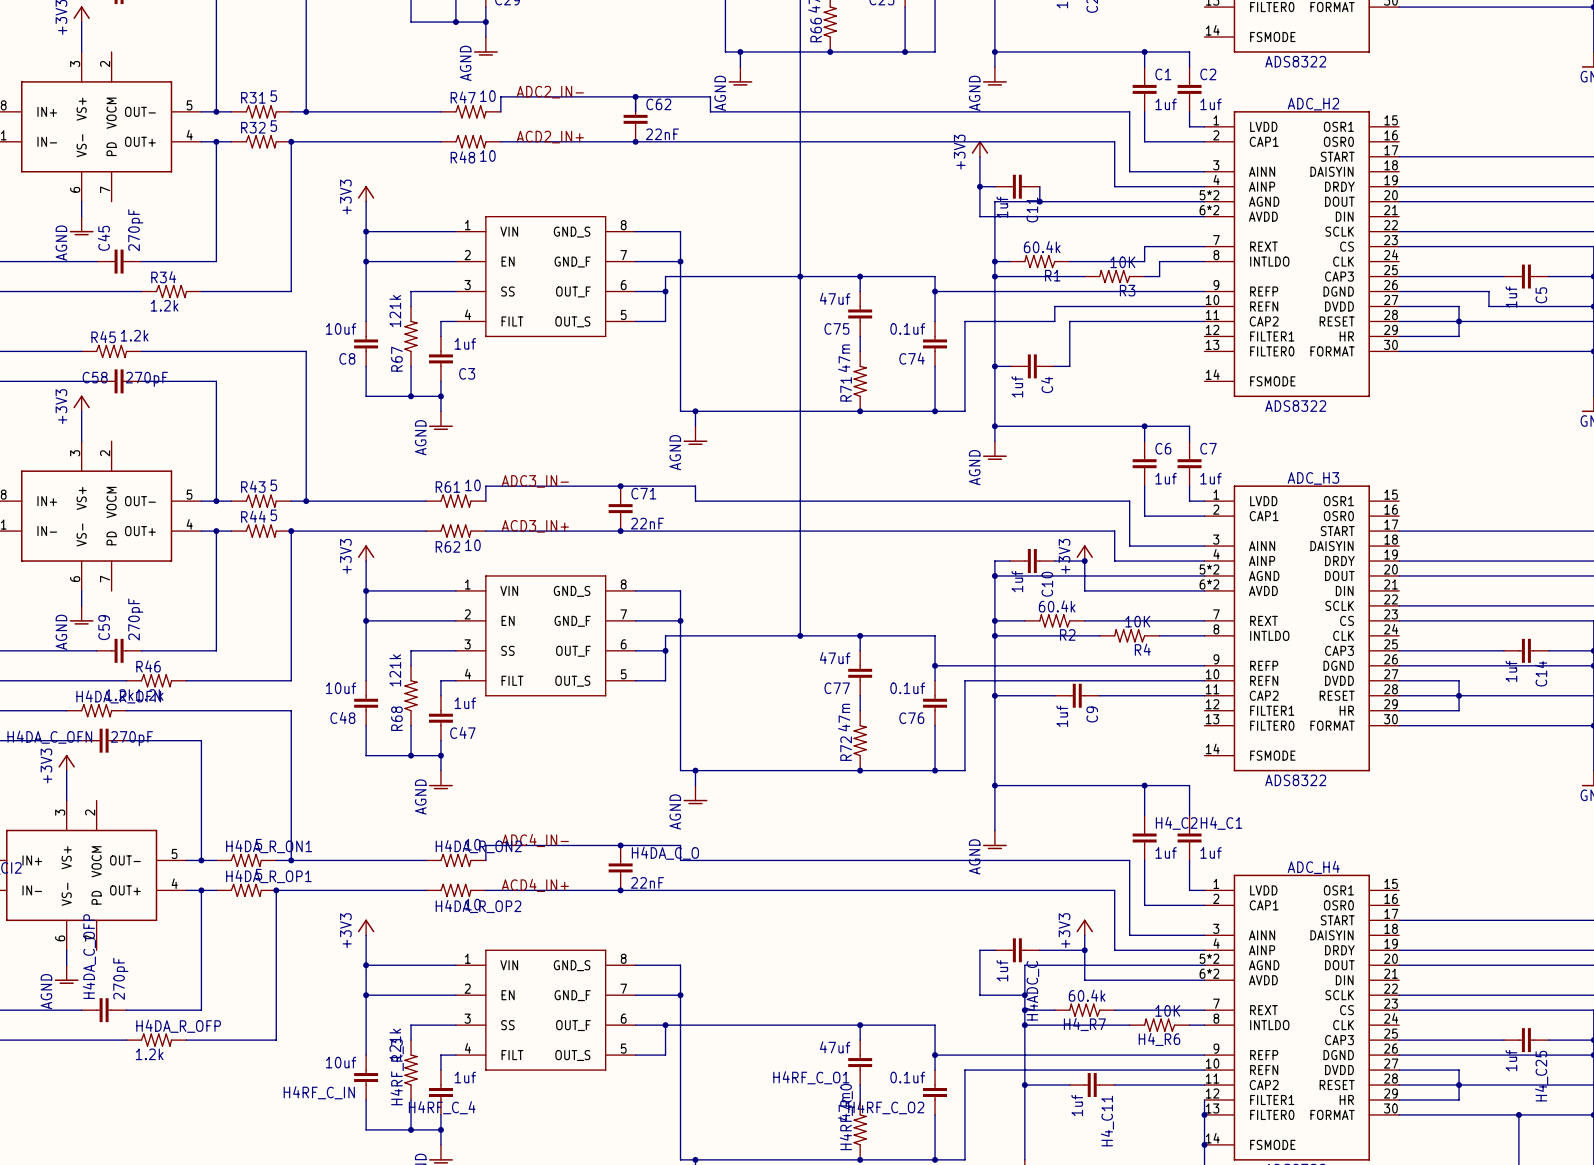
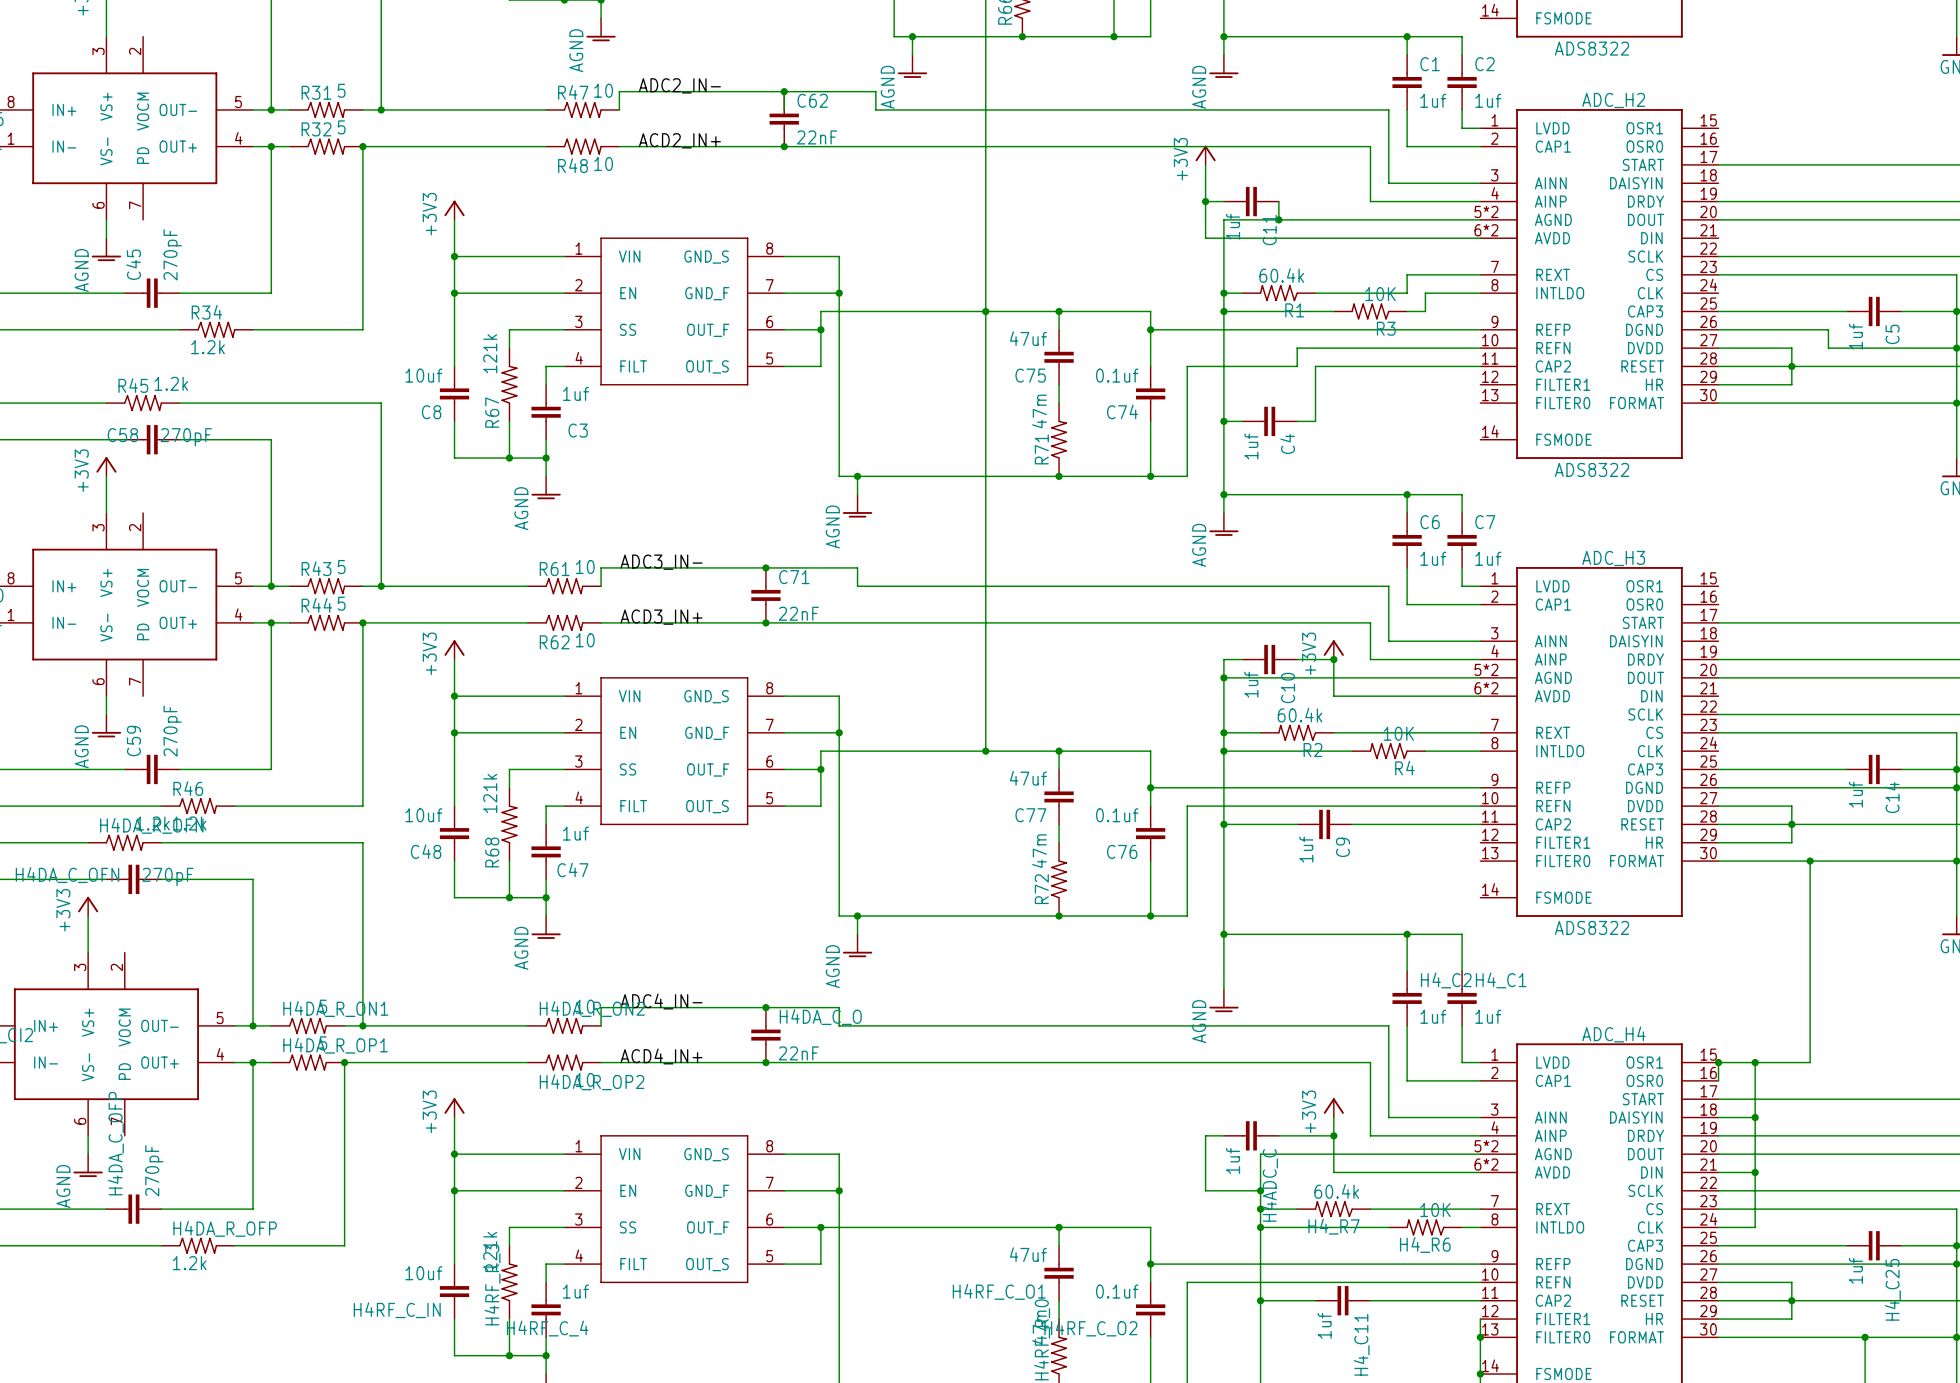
wire: none -> (1810, 861) (1810, 1062) (1718, 1062) (1718, 1080)
junction: none -> (1810, 861)
junction: none -> (1718, 1062)
wire: none -> (1755, 1062) (1755, 1227) (1718, 1227)
junction: none -> (1755, 1062)
wire: none -> (1718, 1117) (1755, 1117)
junction: none -> (1755, 1117)
wire: none -> (1718, 1172) (1755, 1172)
junction: none -> (1755, 1172)

